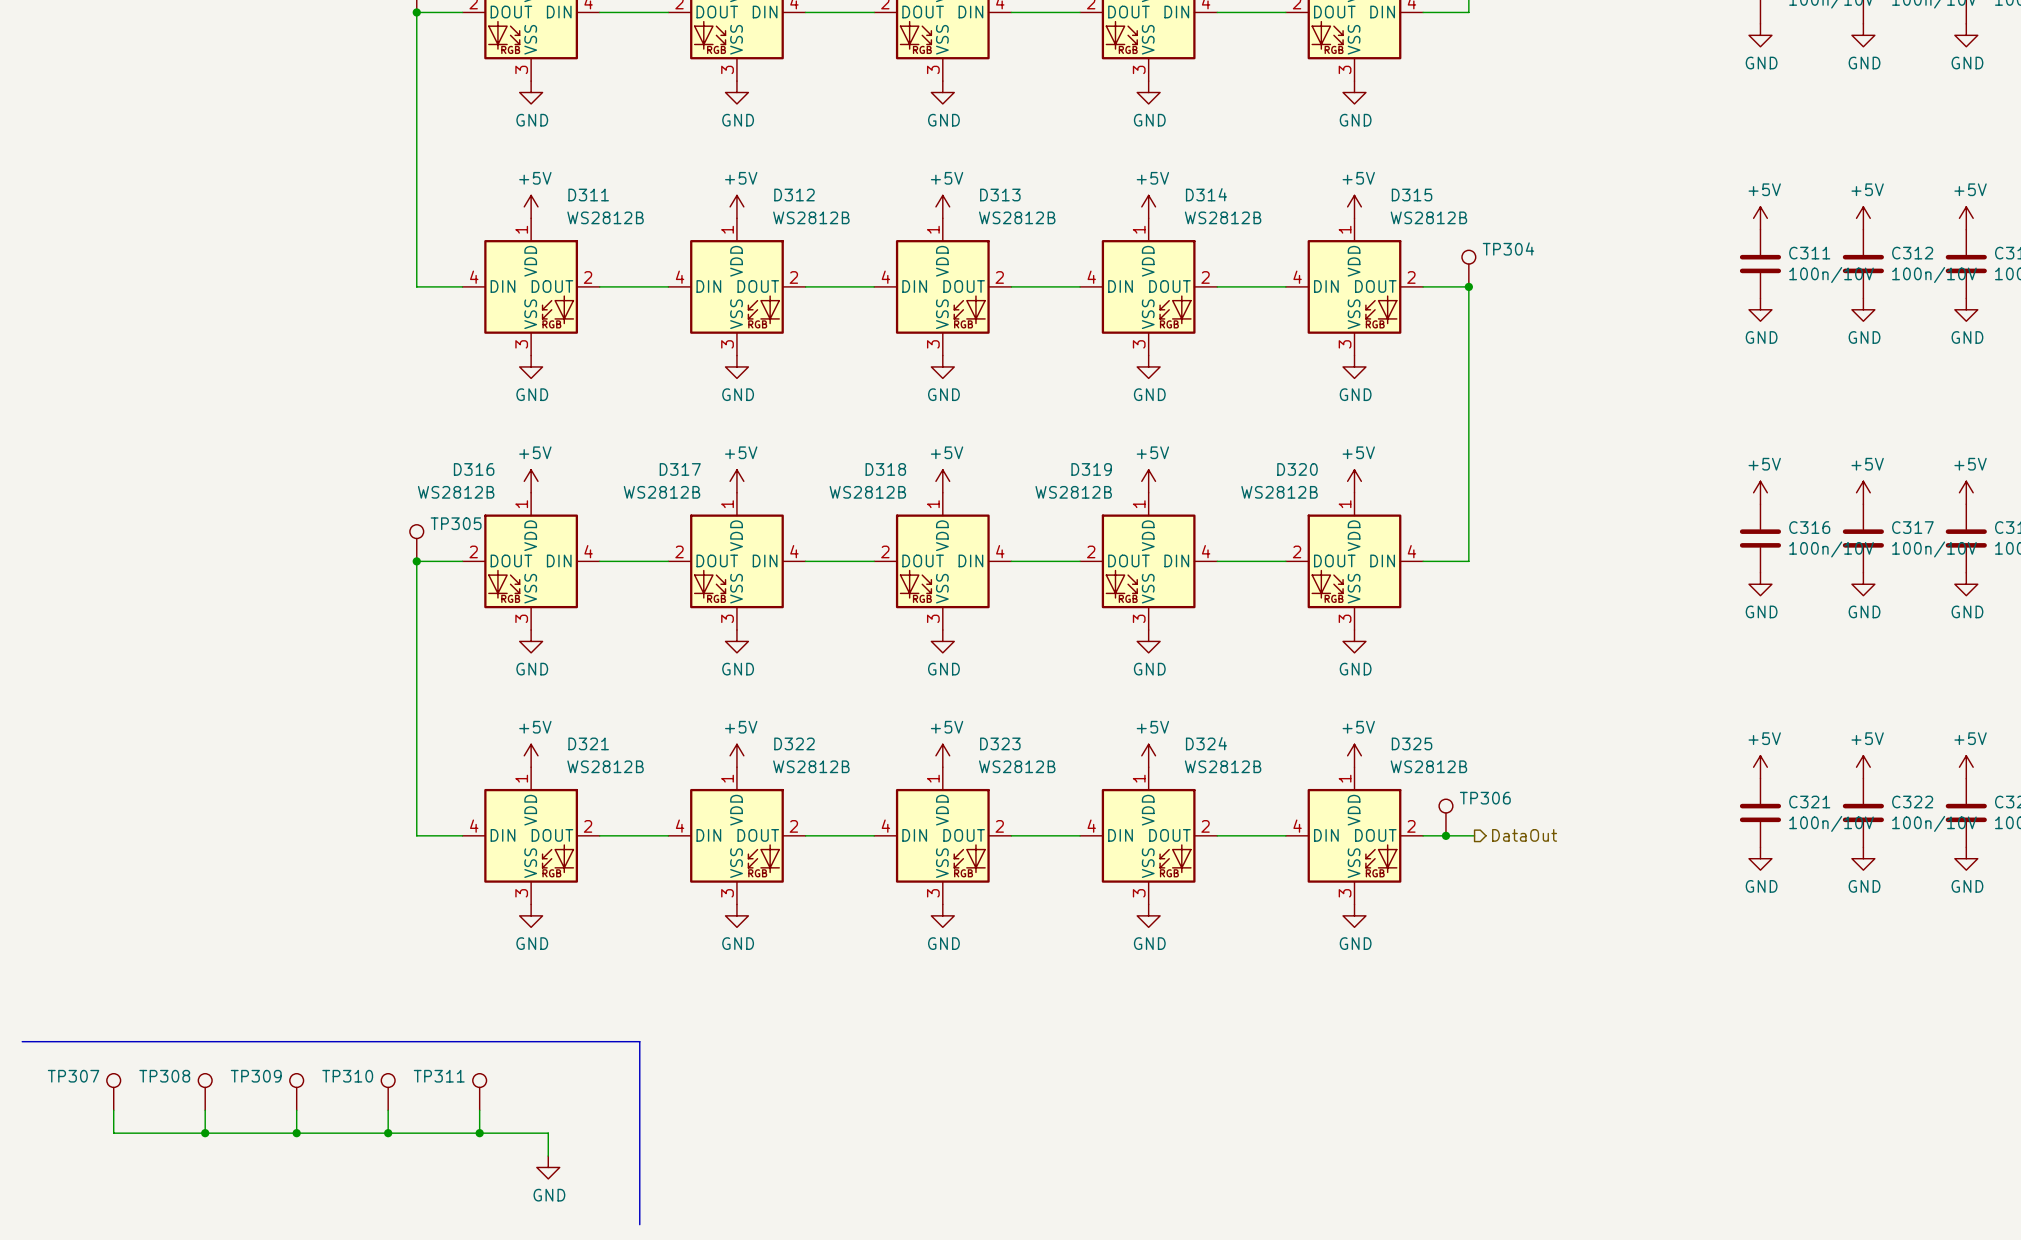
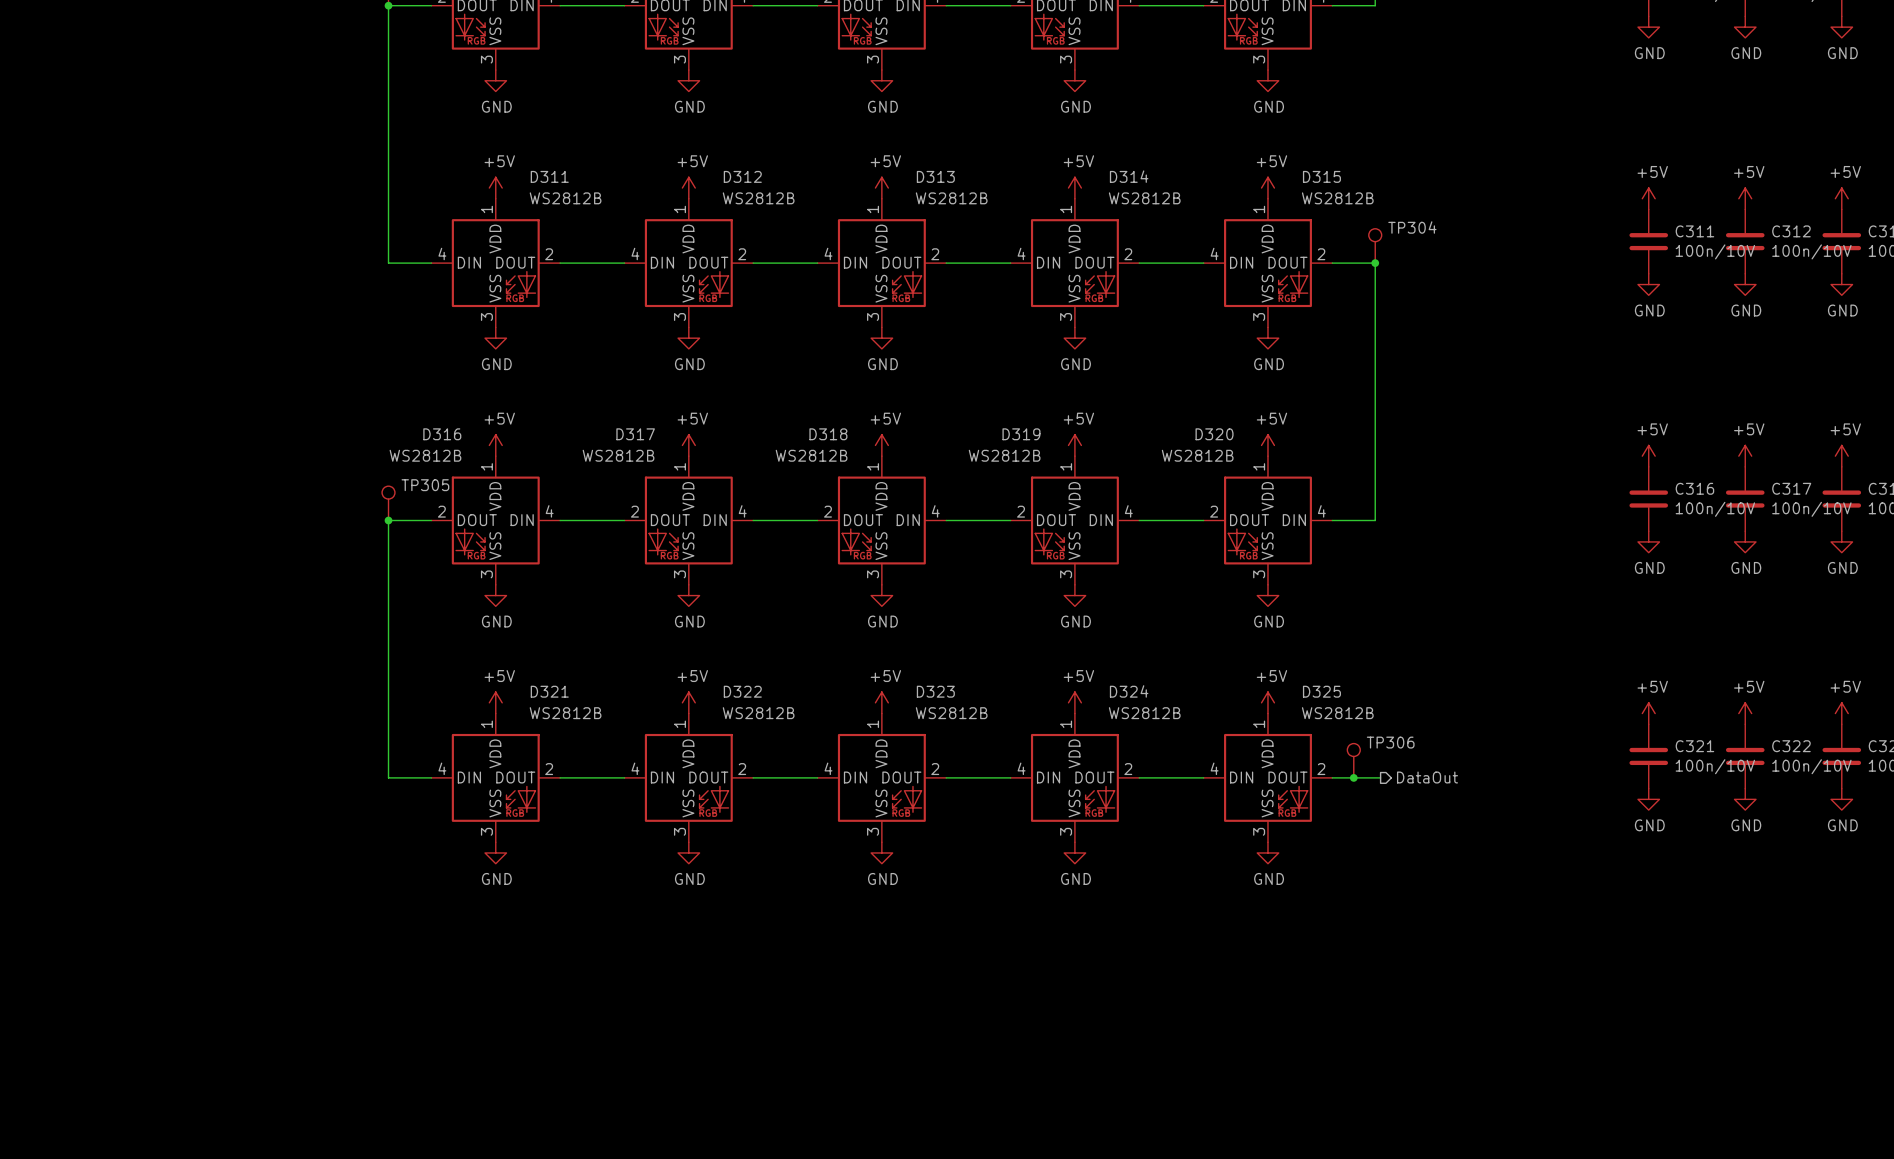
line: (22, 1041) (639, 1041) (639, 1224) -> none
TP307: (113, 1092) -> none
TP308: (205, 1092) -> none
TP309: (296, 1092) -> none
TP310: (388, 1092) -> none
TP311: (479, 1092) -> none
wire: (113, 1110) (113, 1133) (548, 1133) (548, 1156) -> none
wire: (205, 1110) (205, 1133) -> none
wire: (296, 1110) (296, 1133) -> none
wire: (388, 1110) (388, 1133) -> none
wire: (479, 1110) (479, 1133) -> none
junction: (205, 1133) -> none
junction: (296, 1133) -> none
junction: (388, 1133) -> none
junction: (479, 1133) -> none
power symbol: GND (548, 1167) -> none

